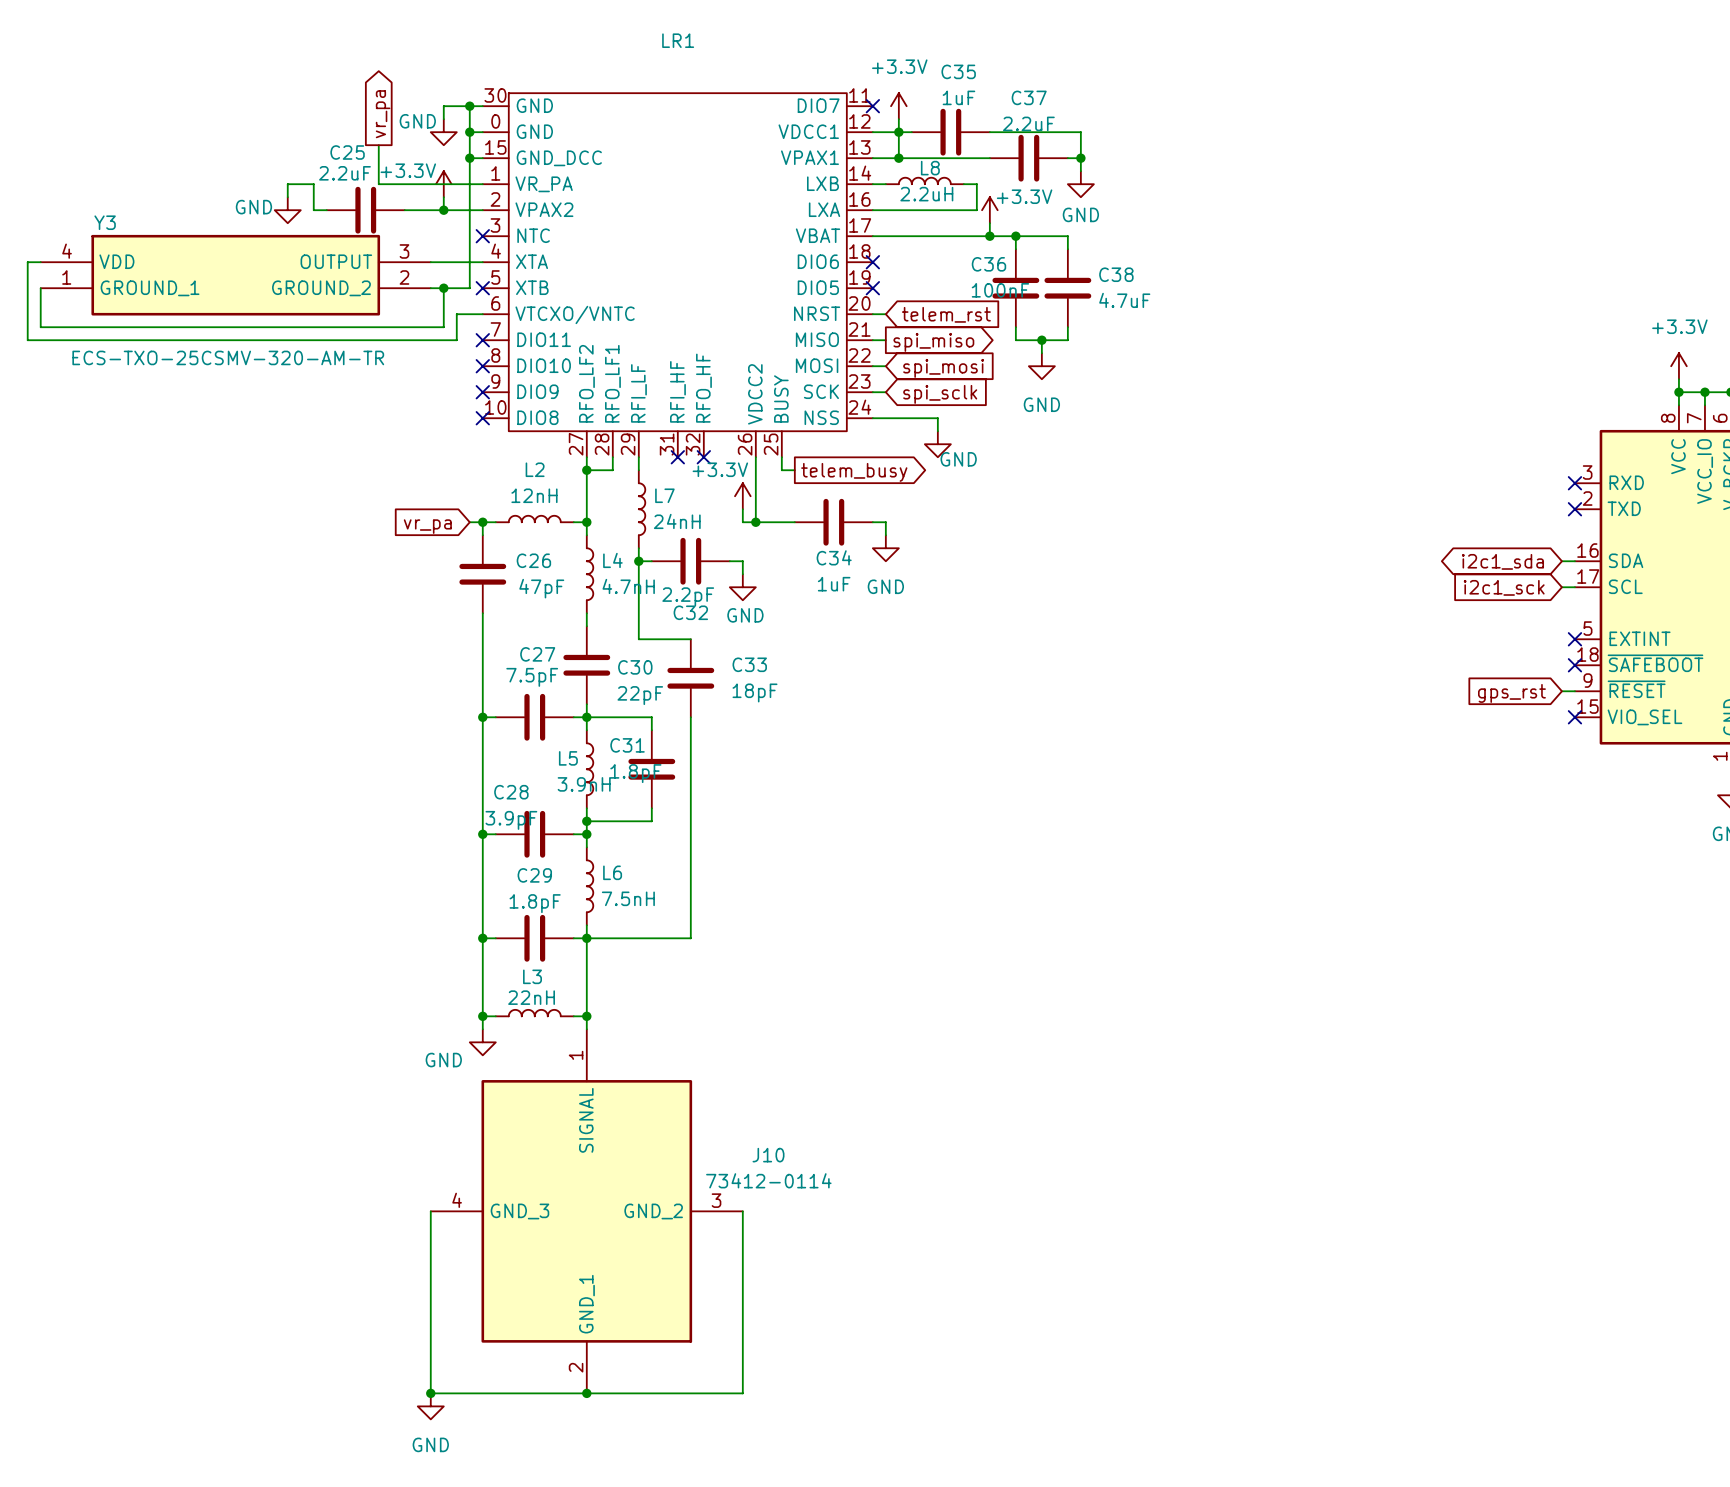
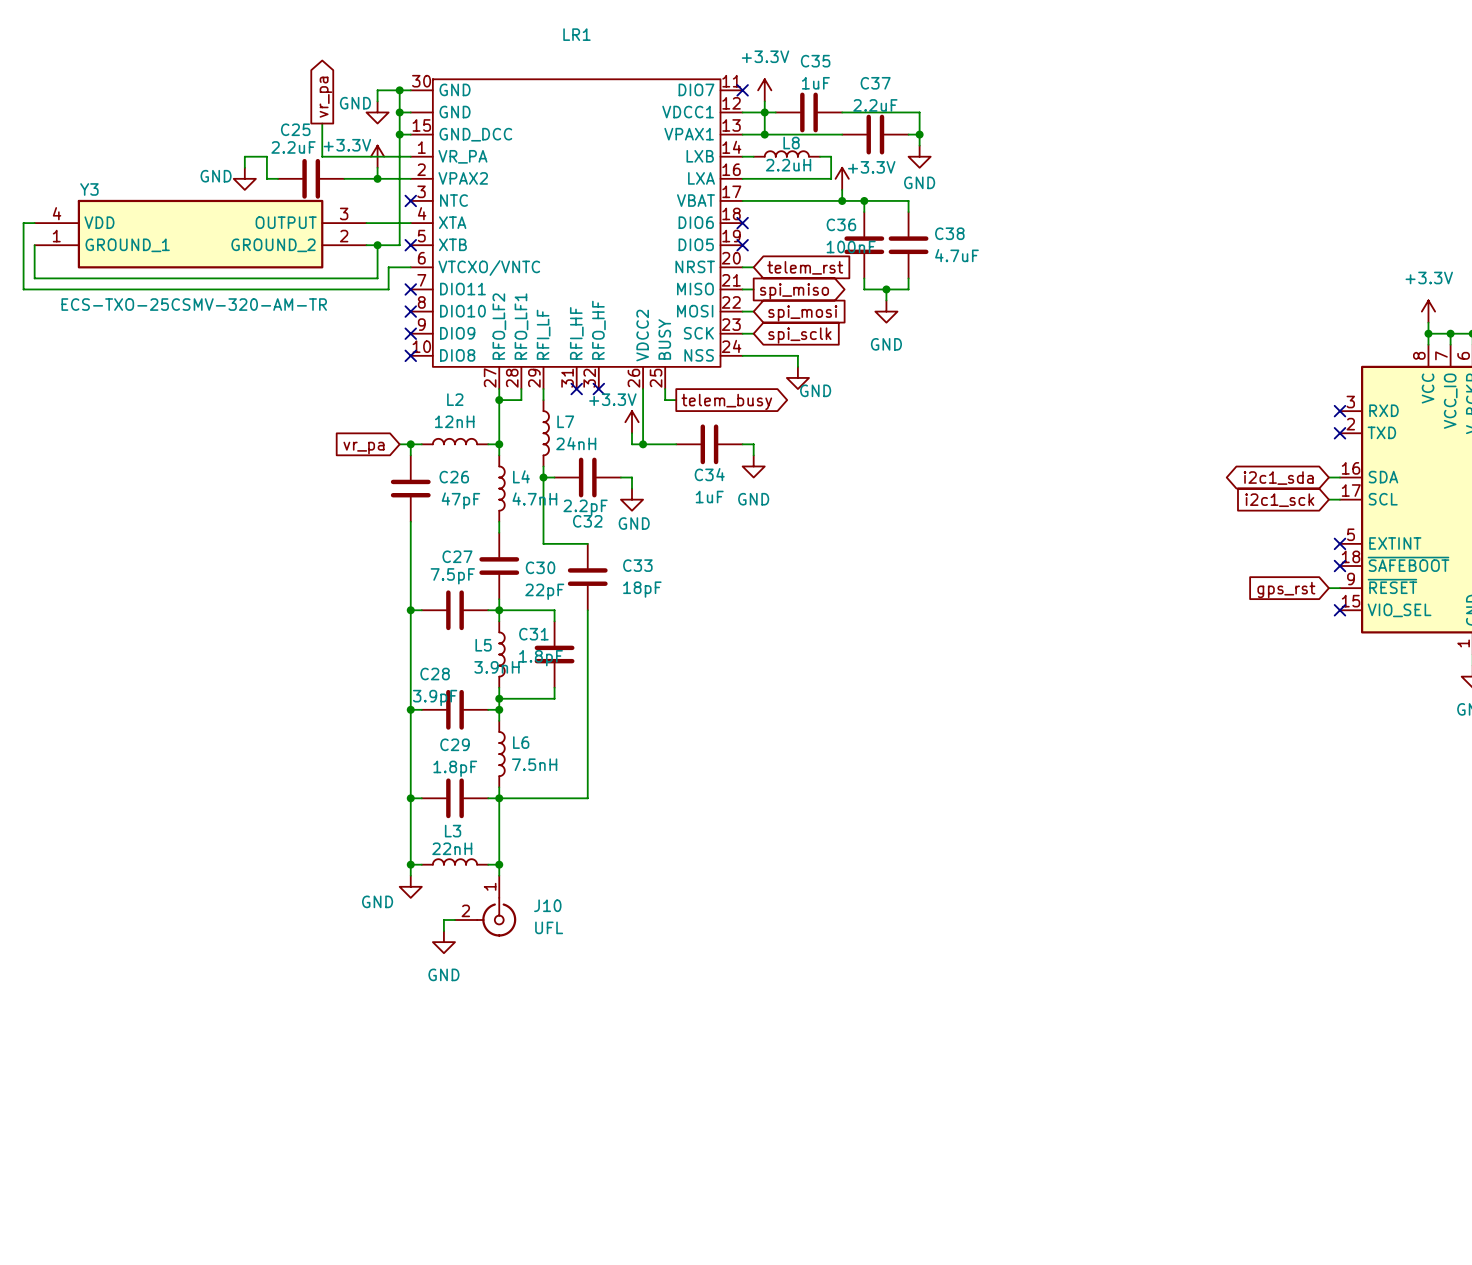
LR1 pin number: 0 (495, 121) -> none
J10 symbol: [430, 1029, 743, 1394] -> [455, 875, 517, 937]
power symbol: none -> GND (443, 942)
J10 name position: J10 (768, 1155) -> J10 (547, 905)
J10 value: 73412-0114 (768, 1180) -> UFL (549, 927)
wire: (430, 1211) (430, 1393) (742, 1393) (742, 1211) -> none
junction: (430, 1393) -> none
junction: (586, 1393) -> none
power symbol: GND (430, 1406) -> none

